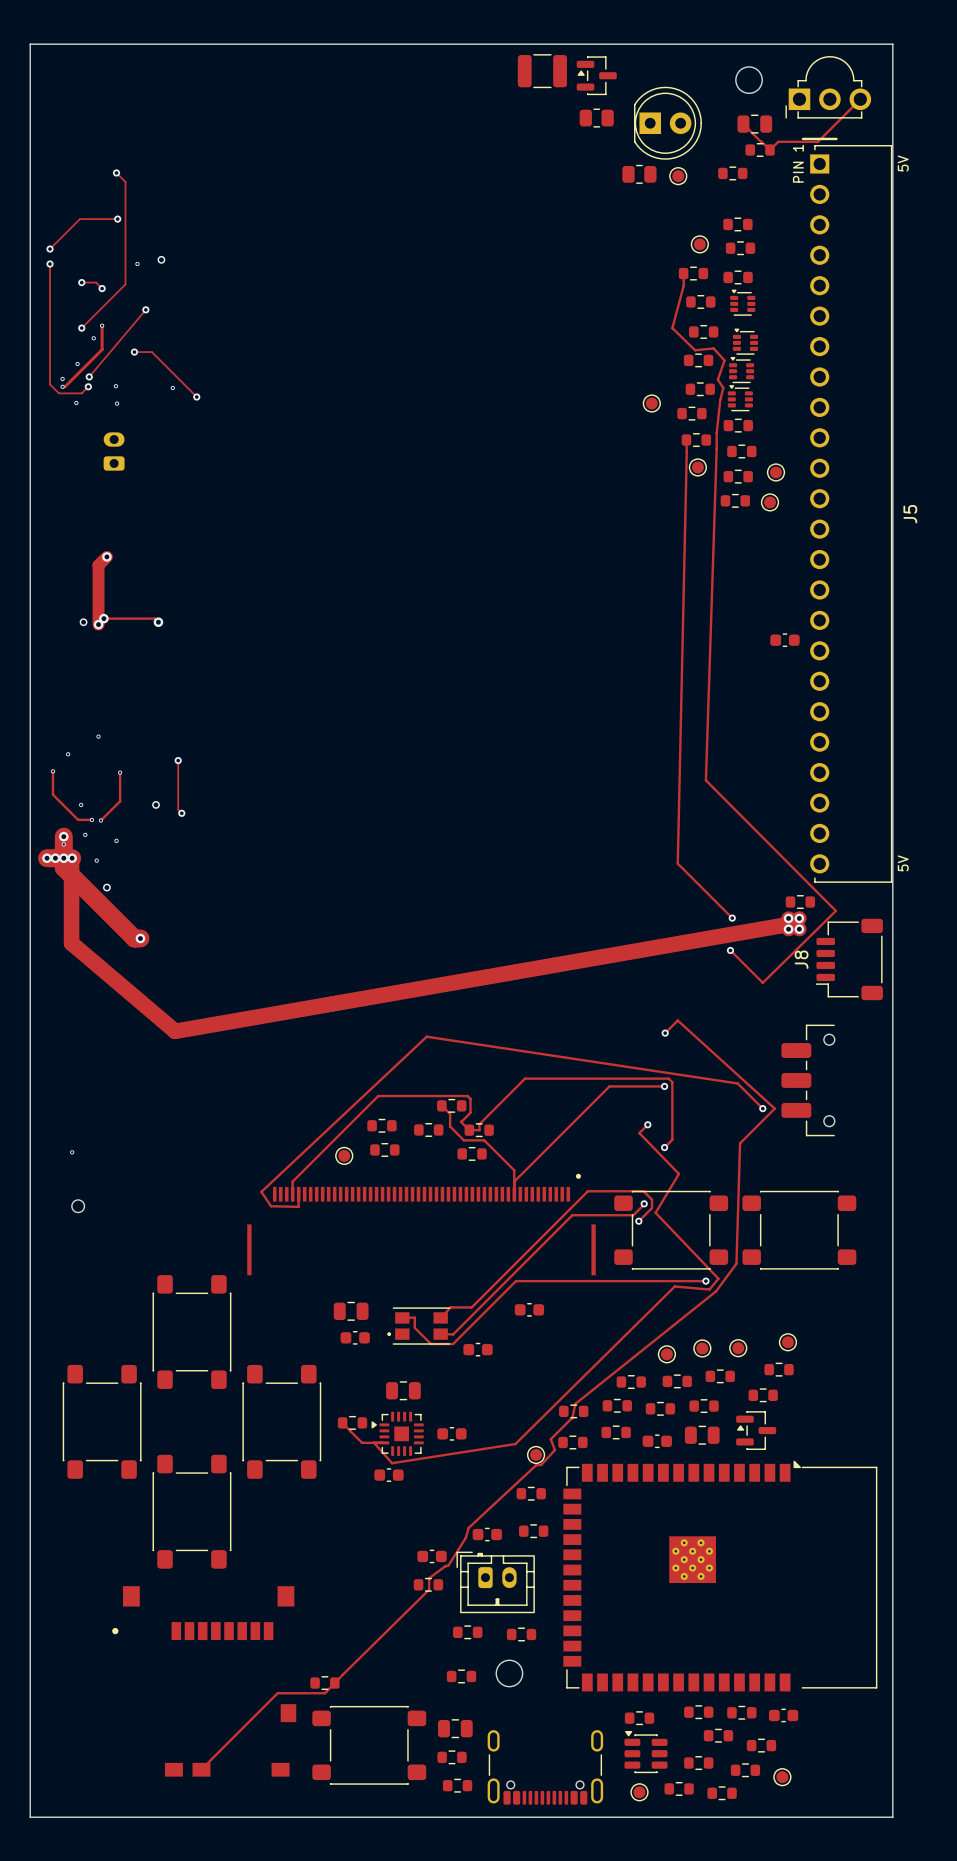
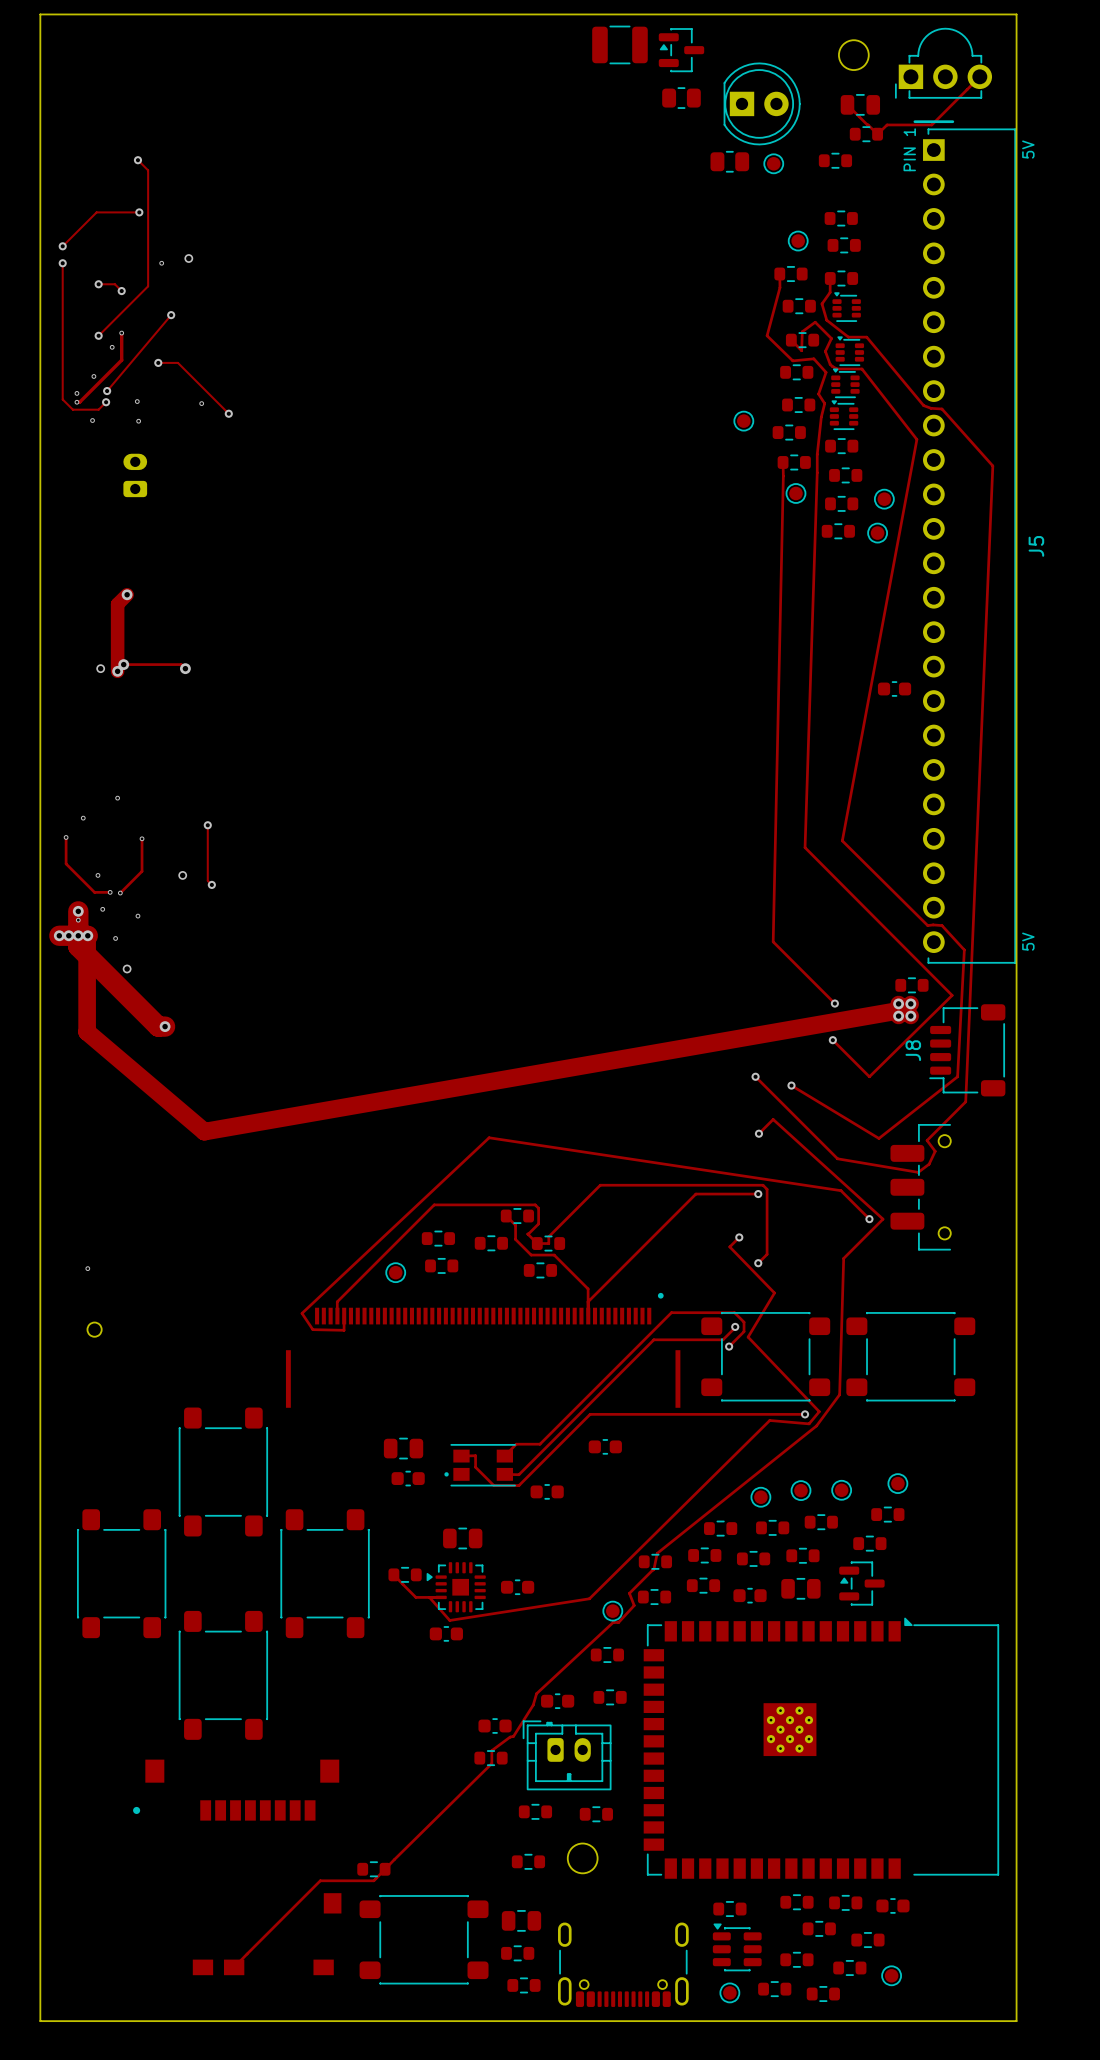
track: none -> (830, 278) (830, 292) (822, 303) (826, 320) (848, 337) (866, 337) (923, 405) (941, 409) (992, 465) (965, 1101) (927, 1140) (935, 1151) (929, 1164) (918, 1172) (837, 1158) (755, 1076)
track: none -> (791, 340) (801, 350) (802, 331) (815, 322) (831, 338) (825, 351) (830, 364) (836, 369) (861, 369) (916, 439) (842, 840) (927, 925) (941, 925) (964, 949) (957, 1076) (878, 1138) (791, 1085)
via: none -> (755, 1076)
via: none -> (791, 1085)

